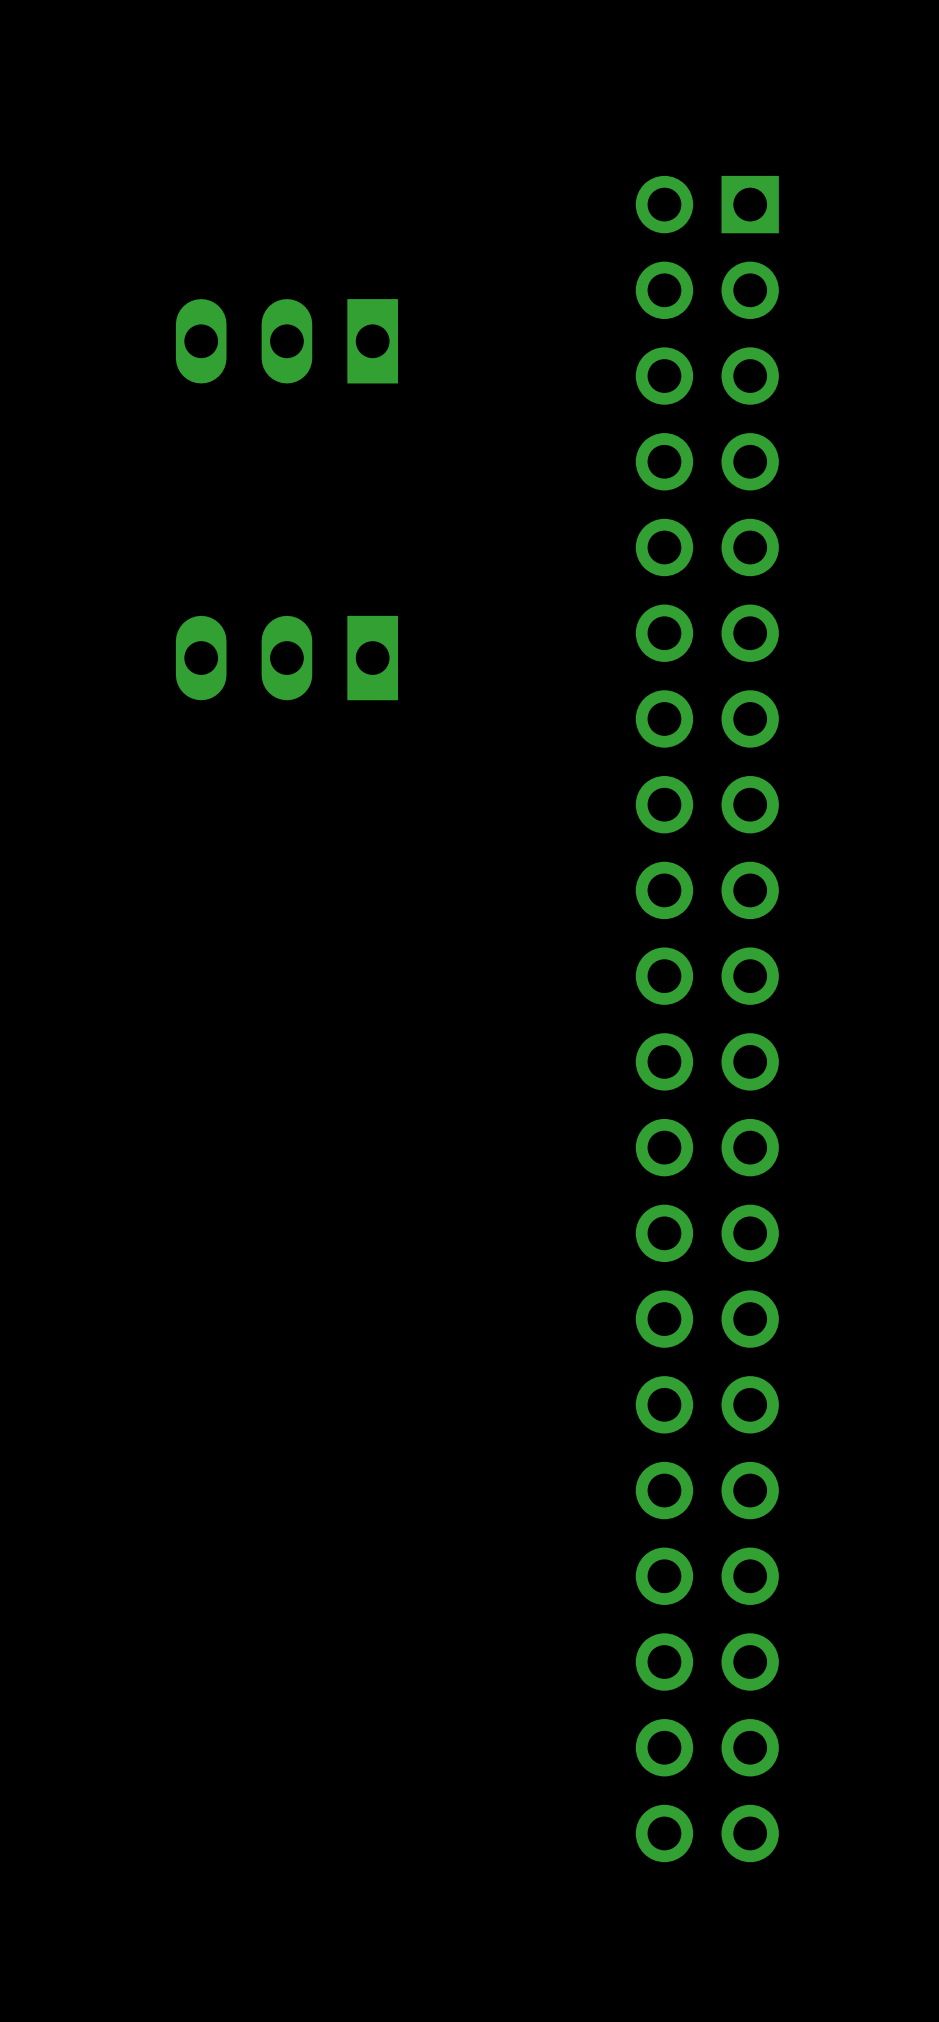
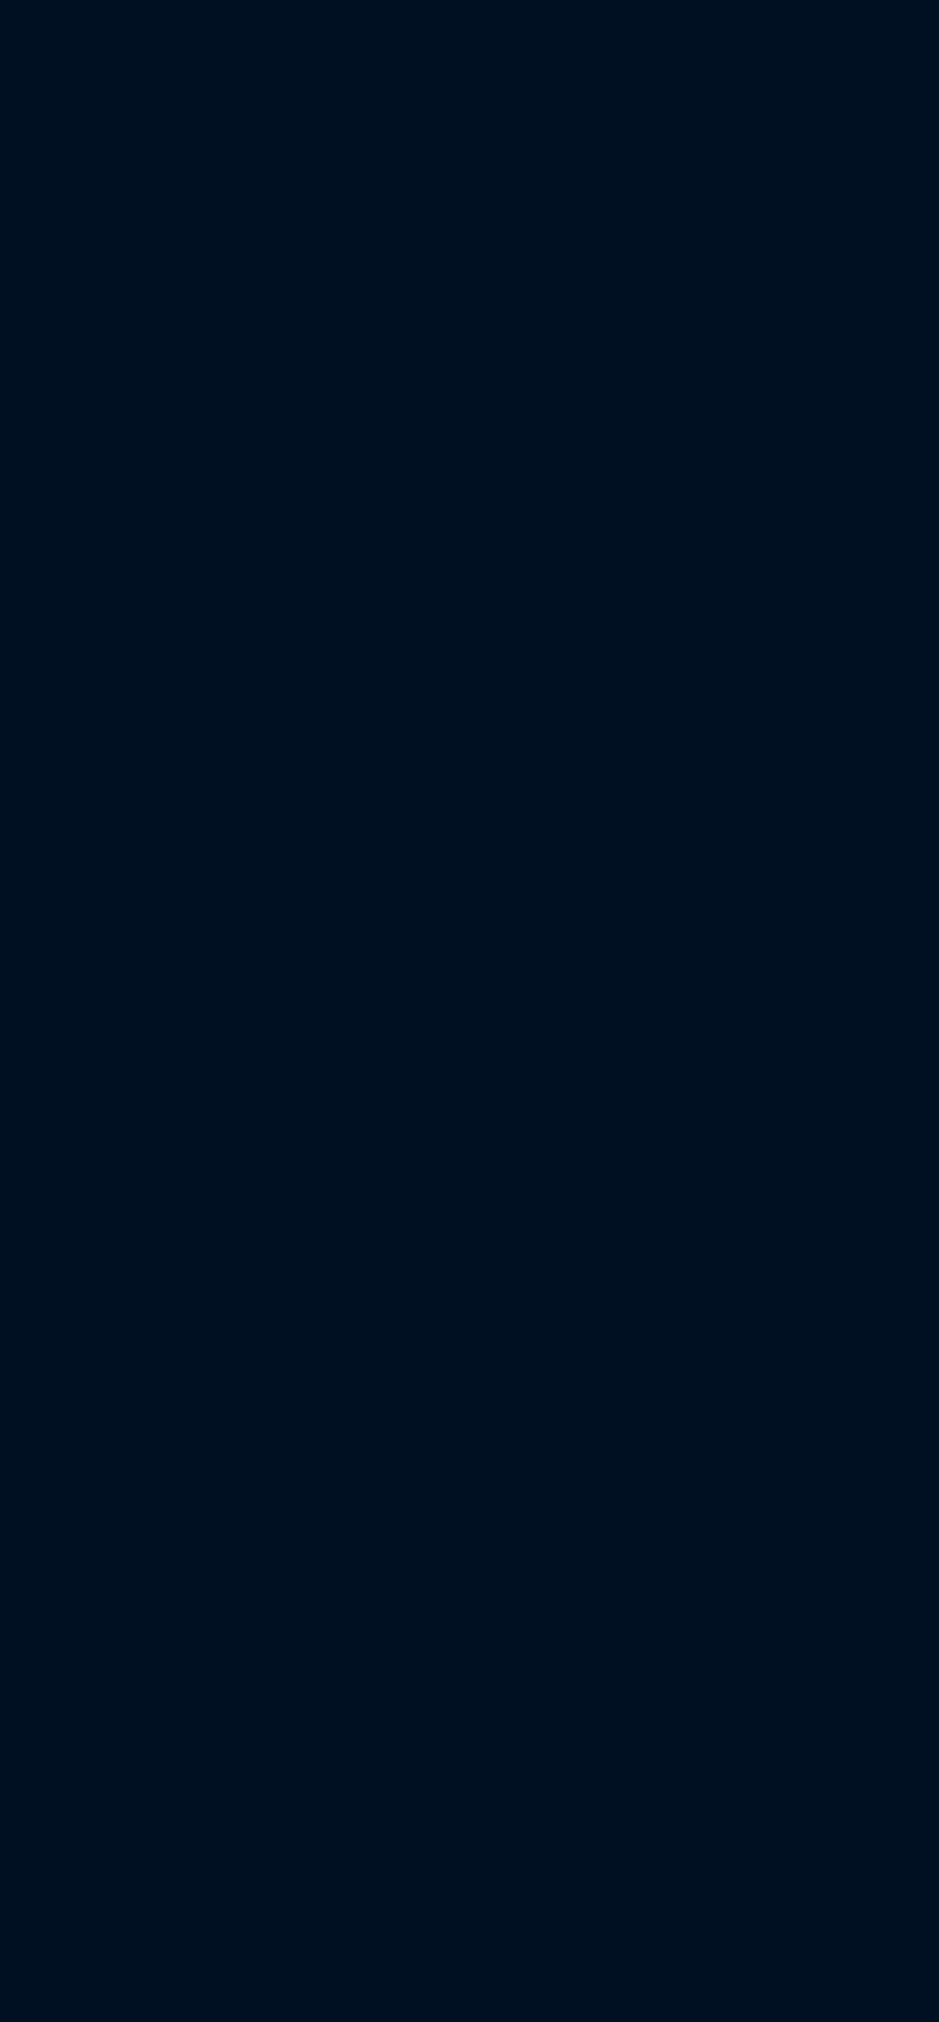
part: (286, 341) -> none
part: (286, 658) -> none
part: (707, 1019) -> none

